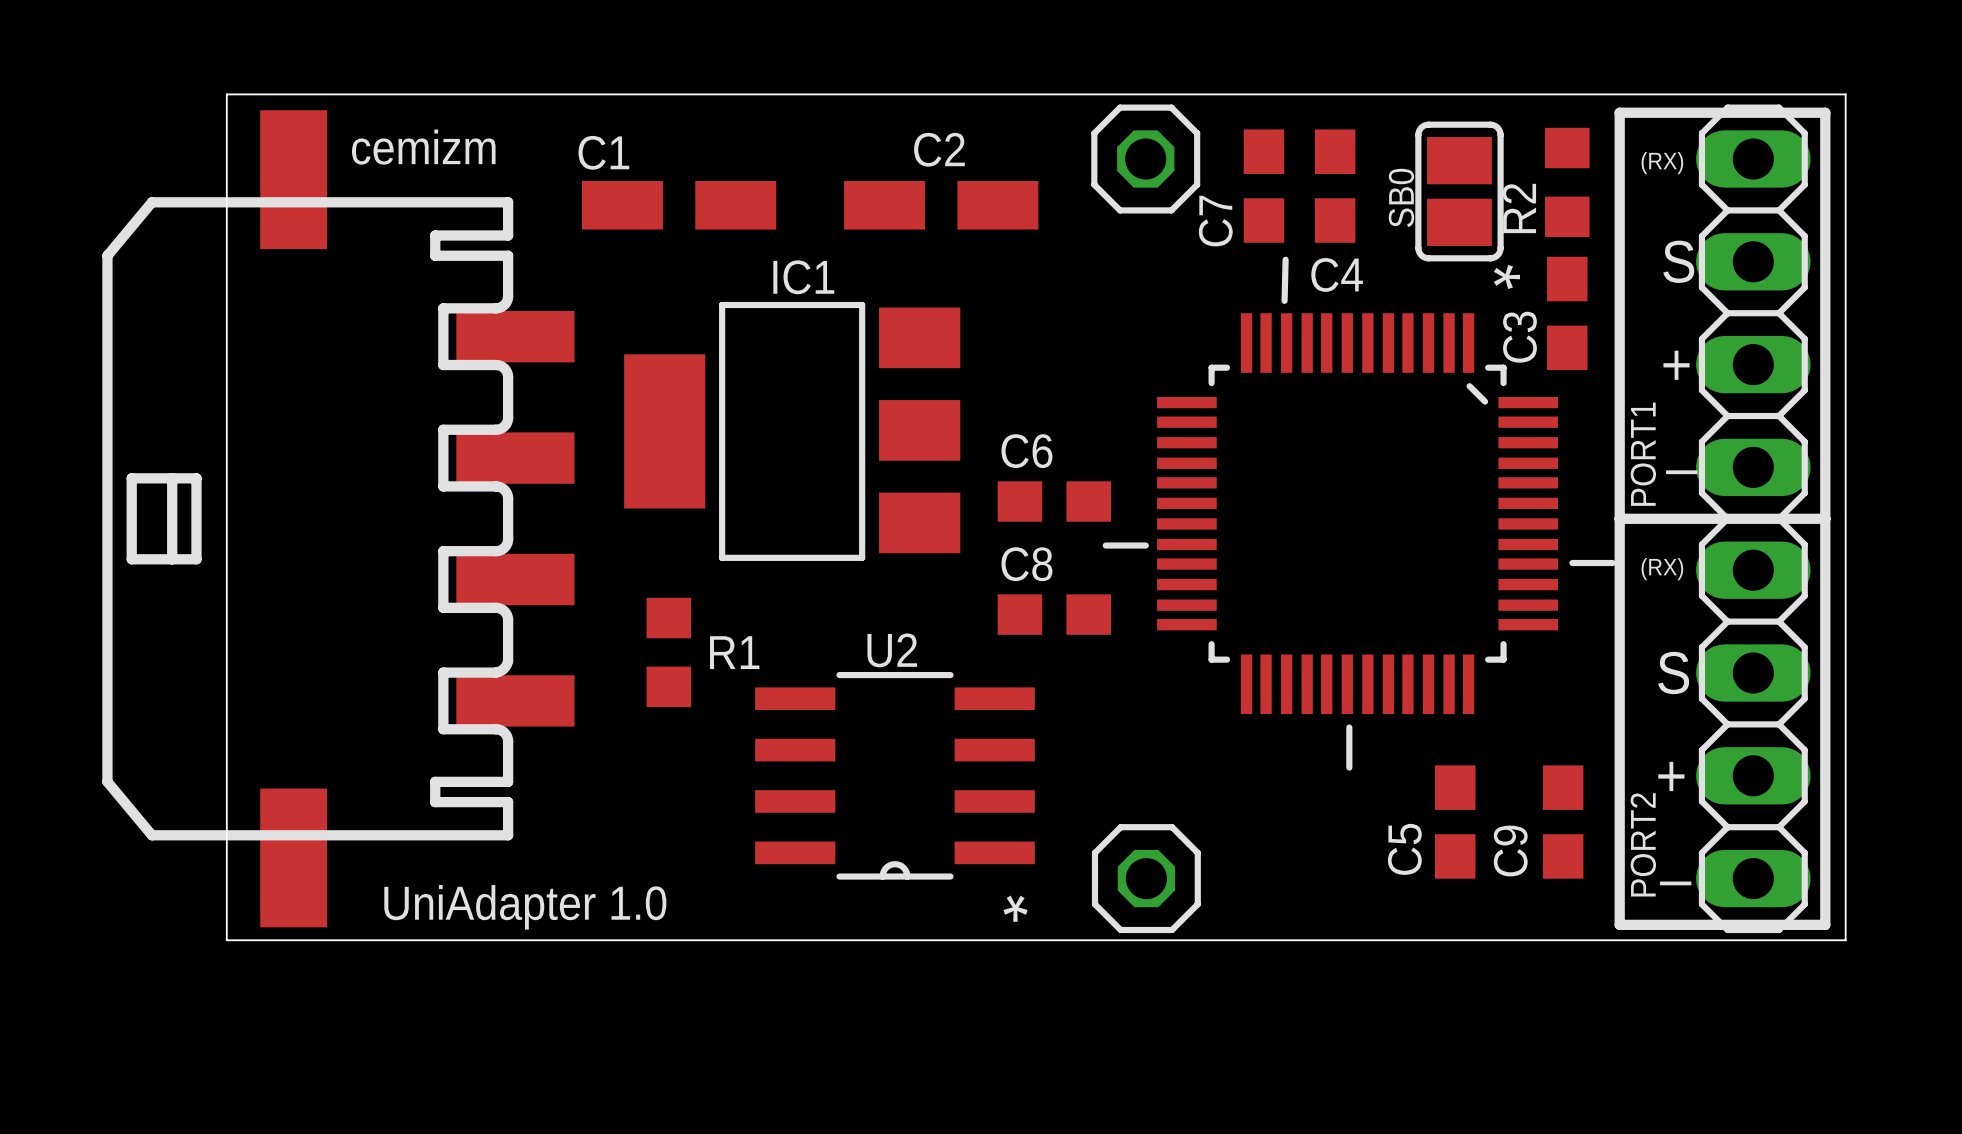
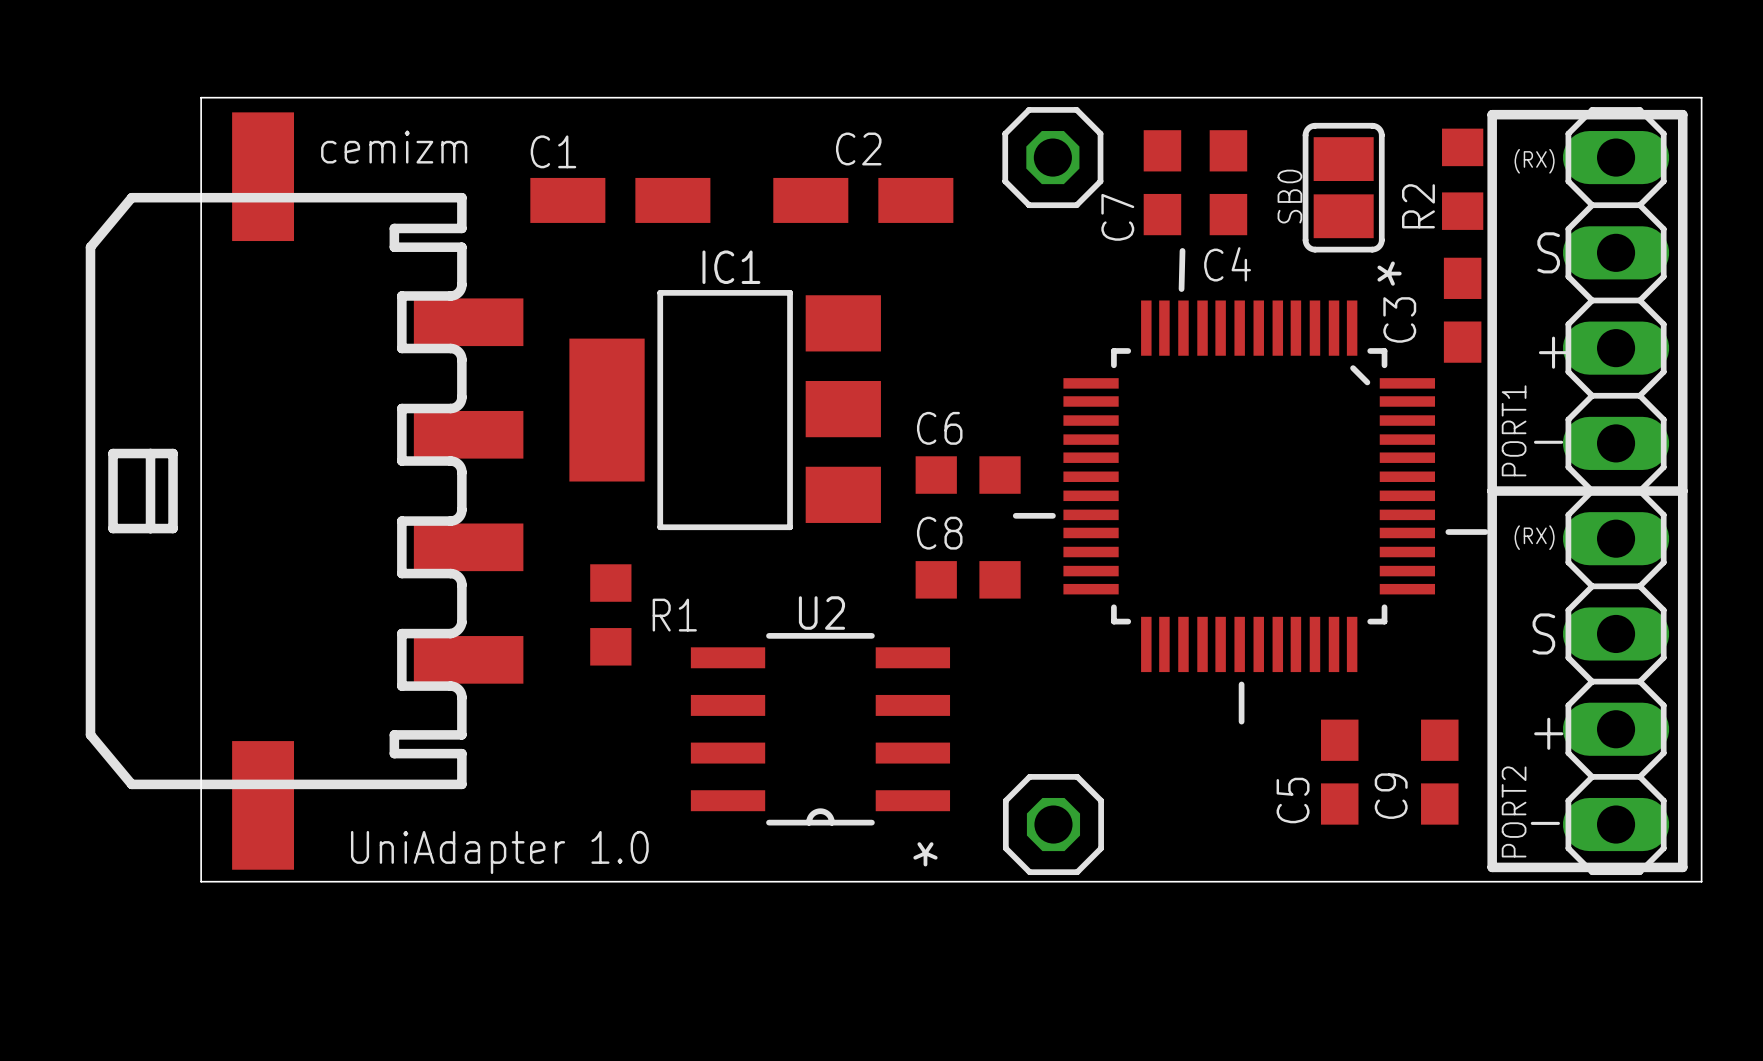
R2 position: (1567, 182) -> (1462, 179)
C3 position: (1567, 313) -> (1462, 310)
text position: PORT2 (1643, 844) -> PORT2 (1514, 811)

